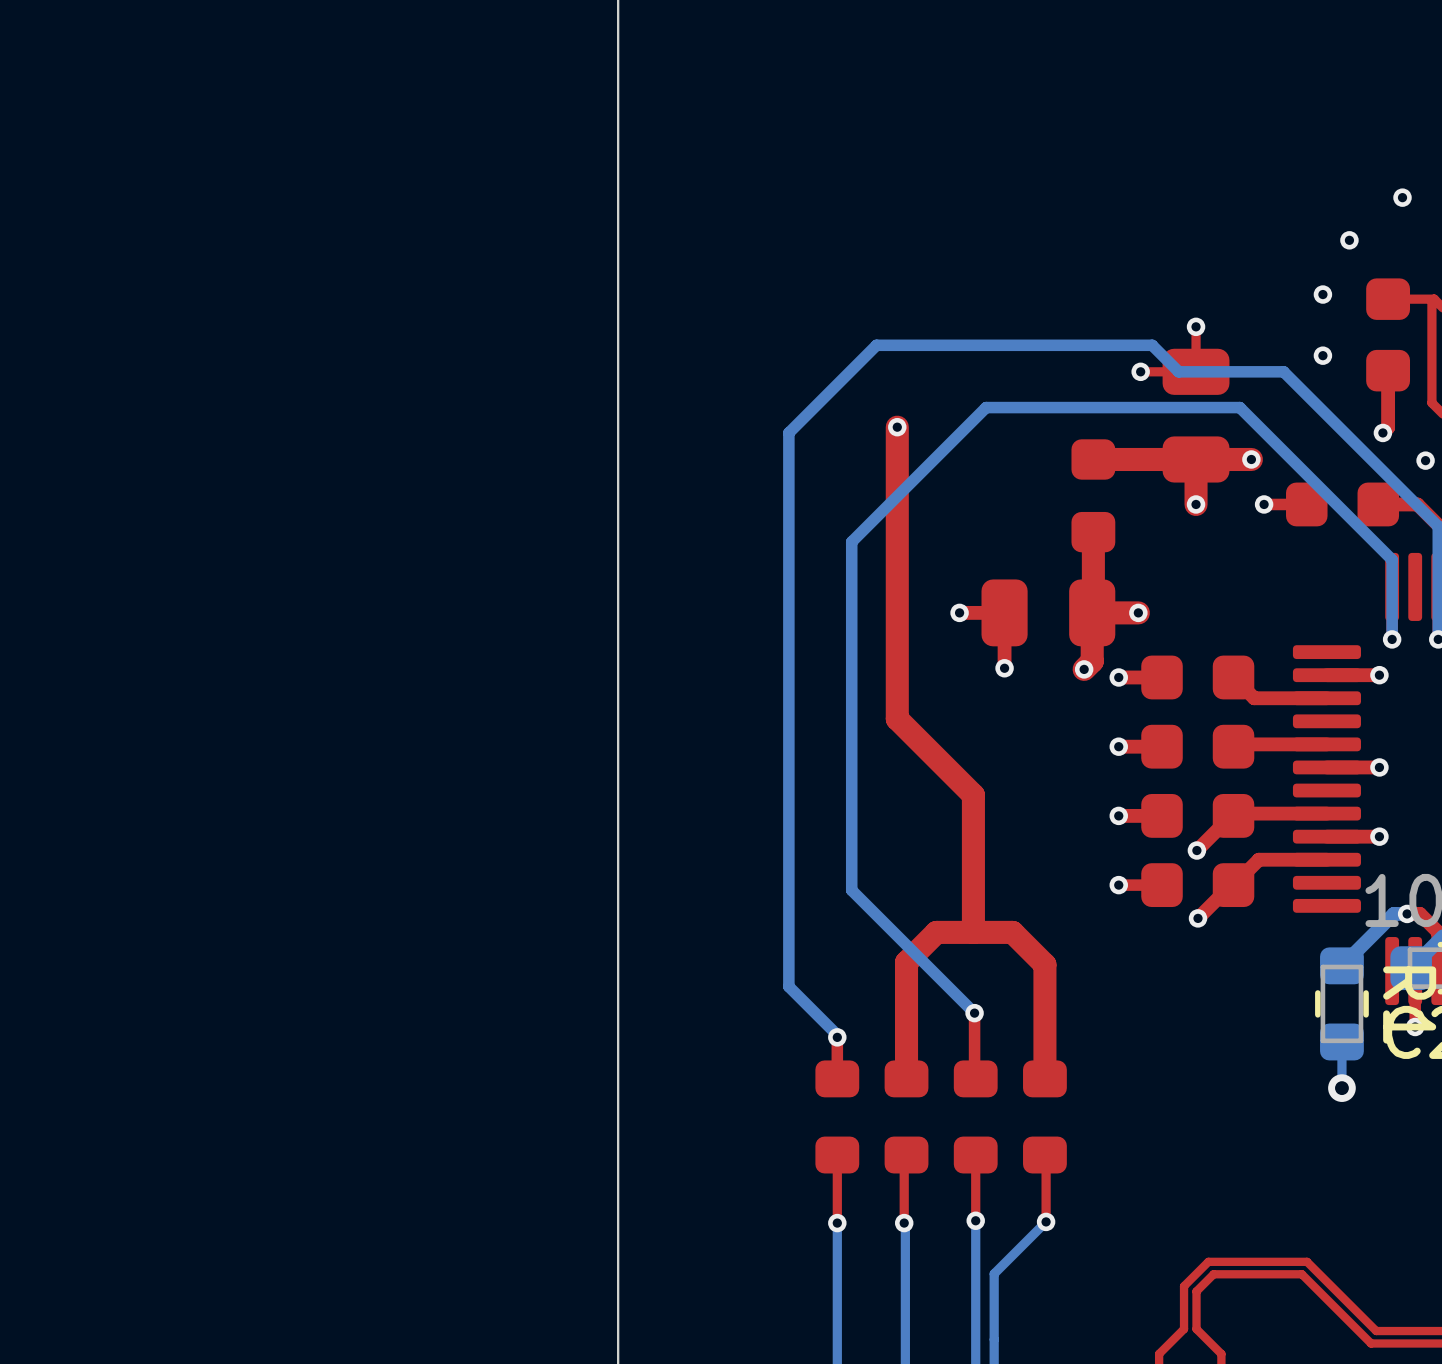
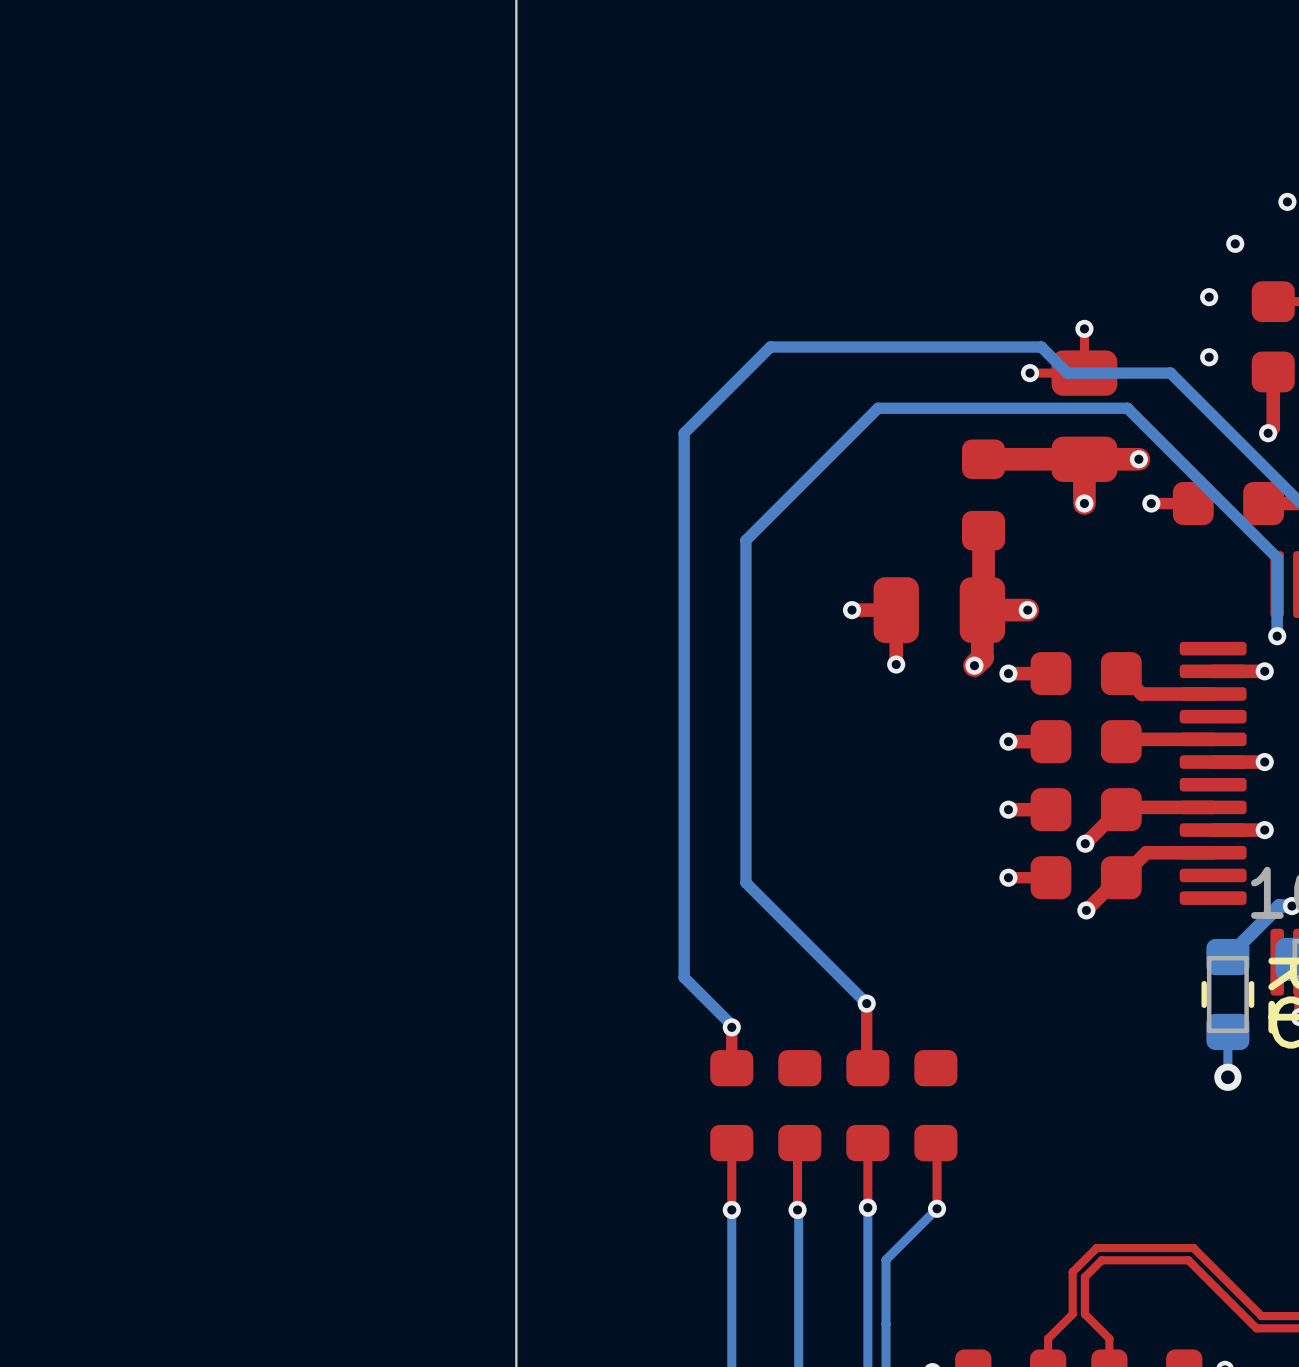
top track: (897, 427) (897, 719) (973, 795) (973, 932) -> none
via: (897, 427) -> none
top track: (1044, 1078) (1044, 964) (1012, 932) (936, 932) (906, 962) (906, 1078) -> none

